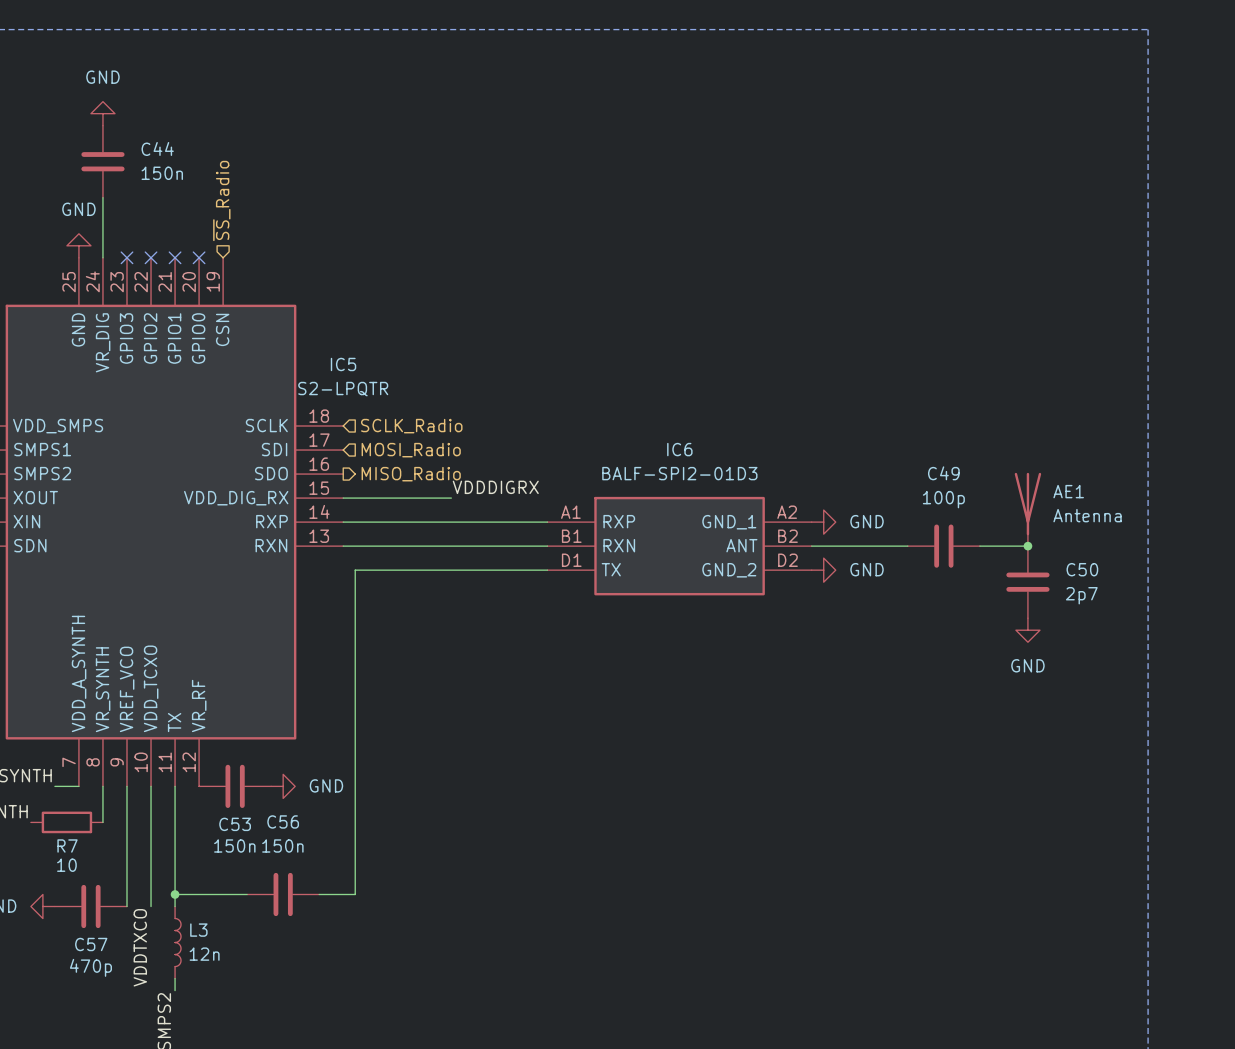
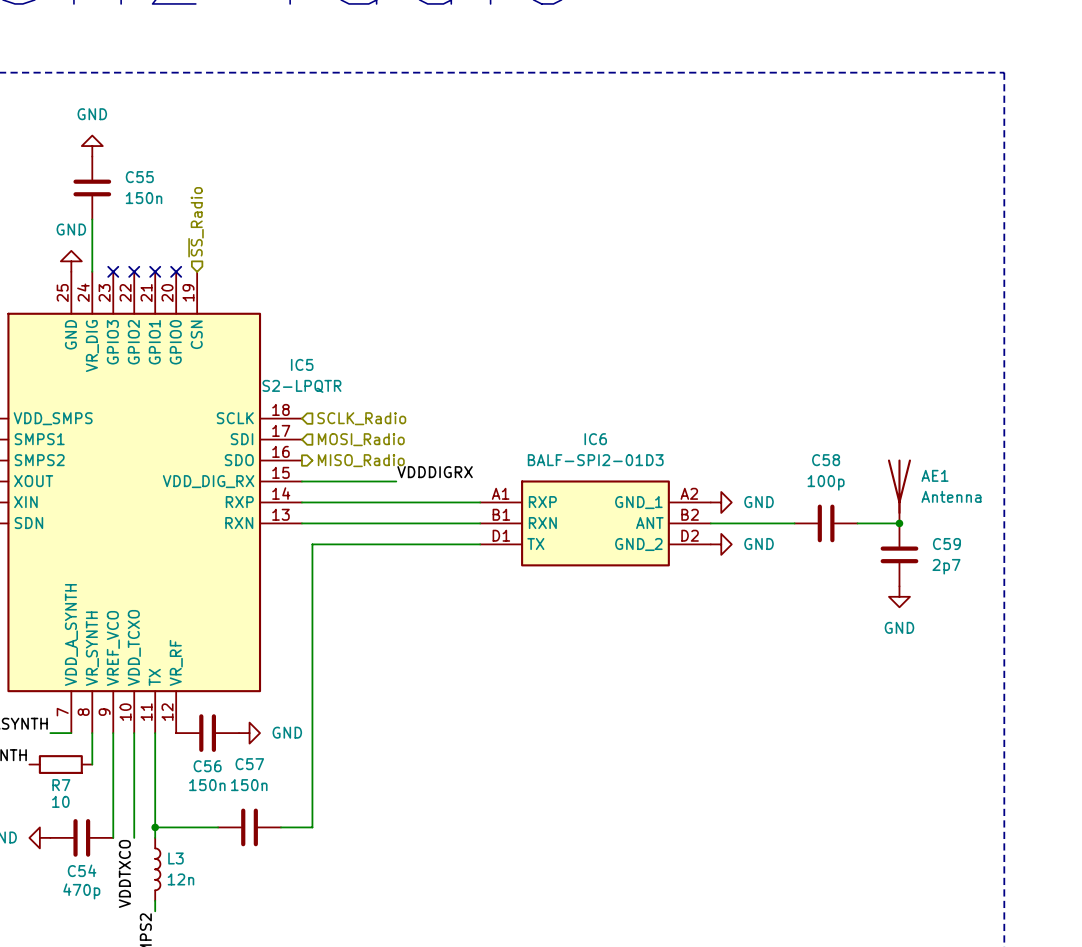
C44 name: C44 (157, 148) -> C55 (139, 177)
C49 name: C49 (943, 473) -> C58 (826, 460)
C50 name: C50 (1082, 569) -> C59 (946, 544)
C56 name: C56 (283, 821) -> C57 (249, 764)
C53 name: C53 (235, 824) -> C56 (207, 766)
C57 name: C57 (91, 944) -> C54 (82, 870)

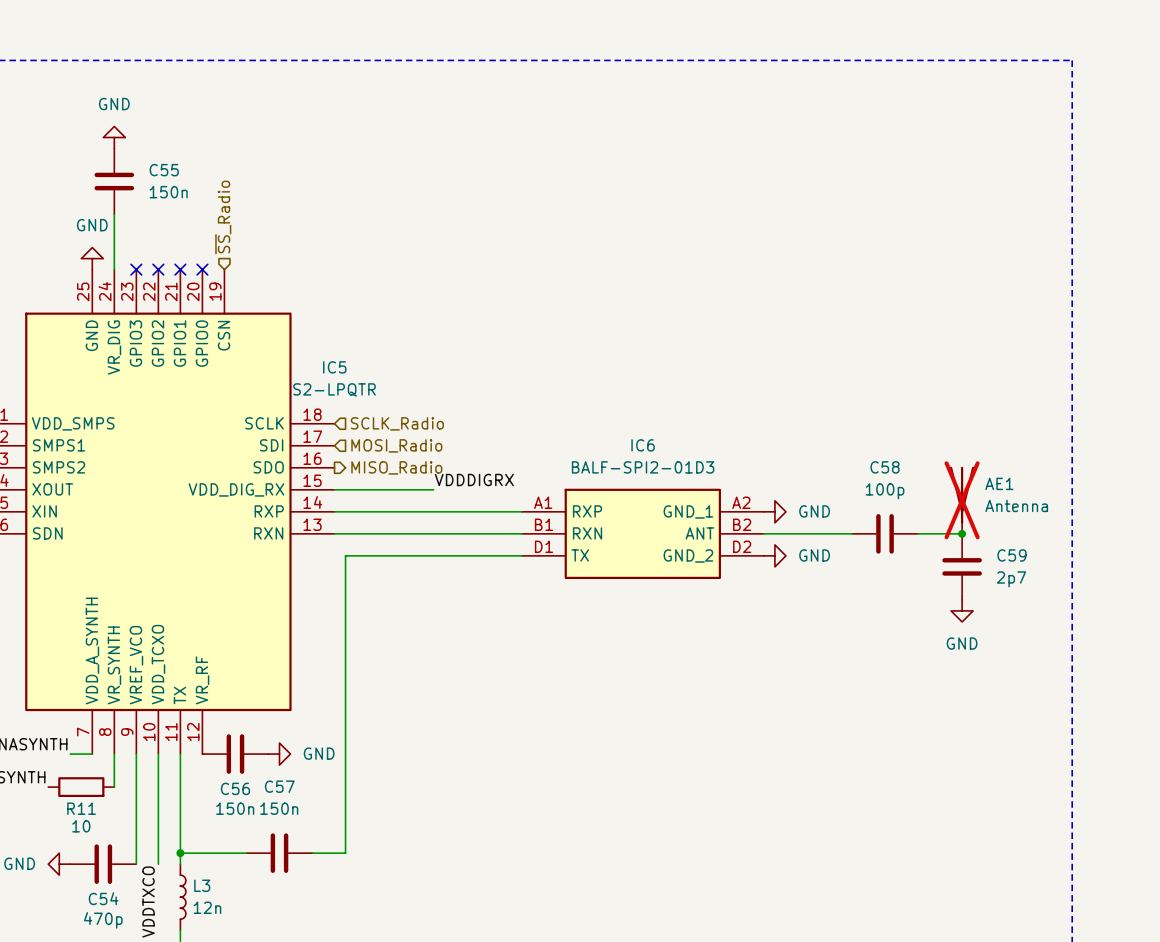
AE1 do-not-place cross: none -> (962, 500)
R7 name: R7 (61, 785) -> R11 (81, 808)

